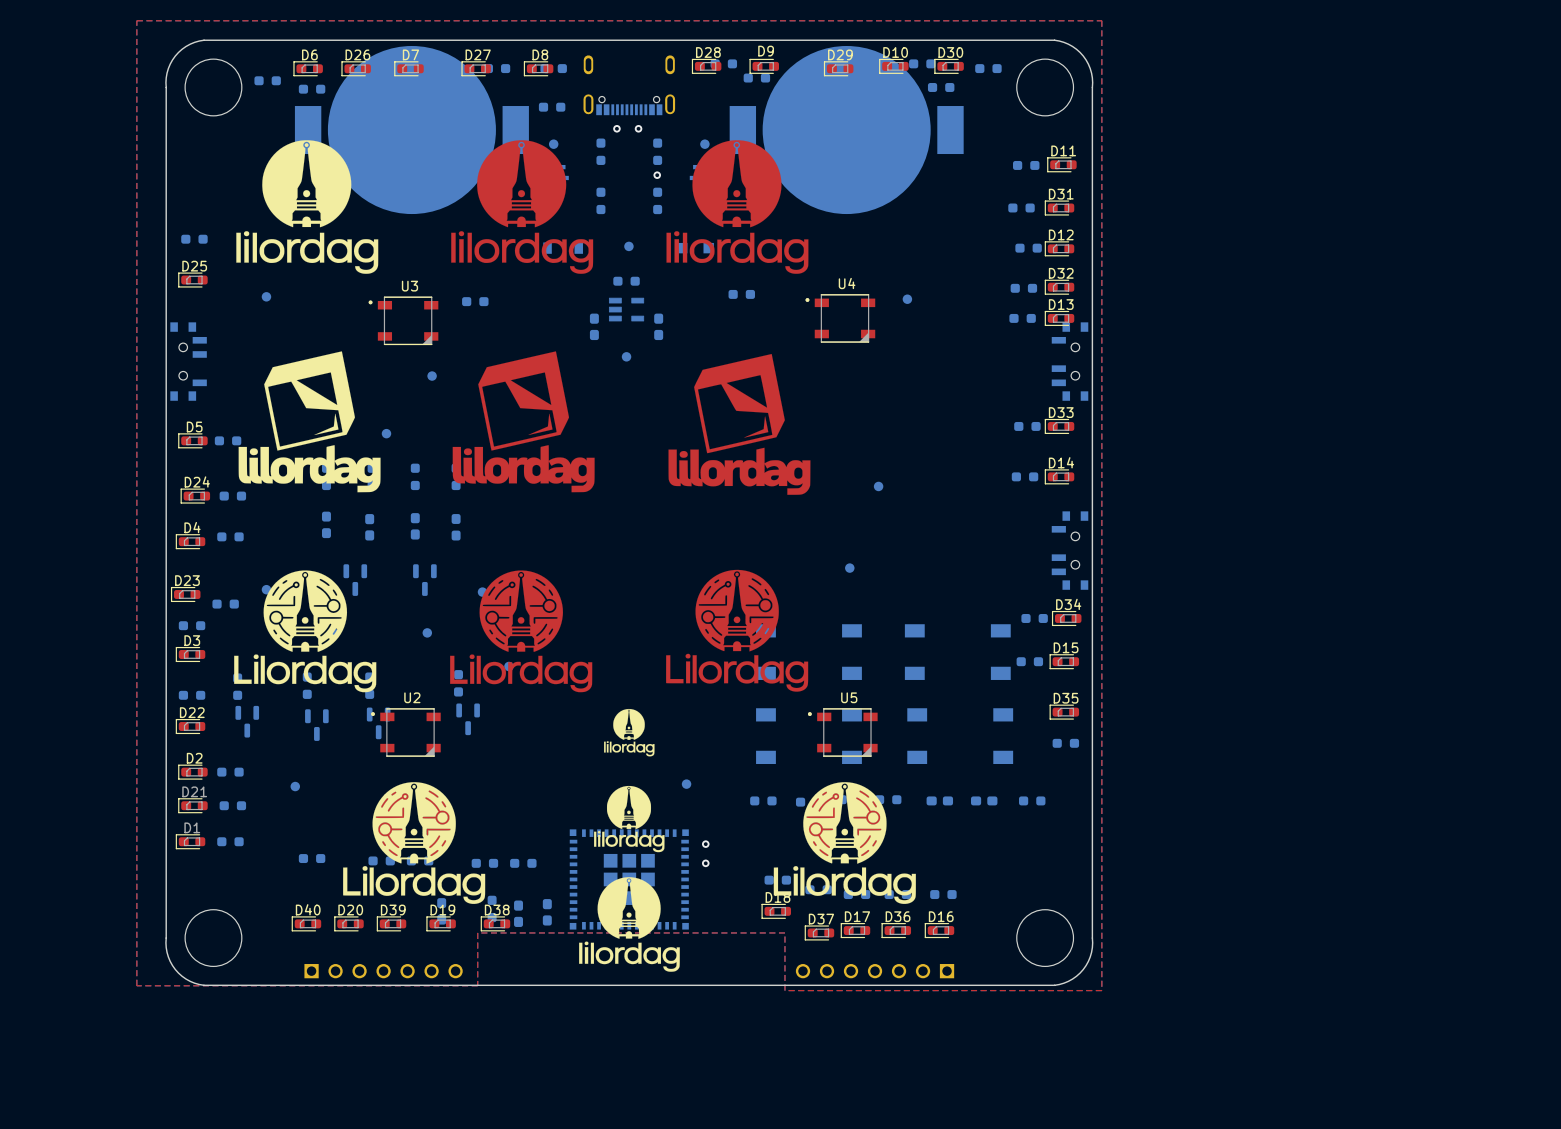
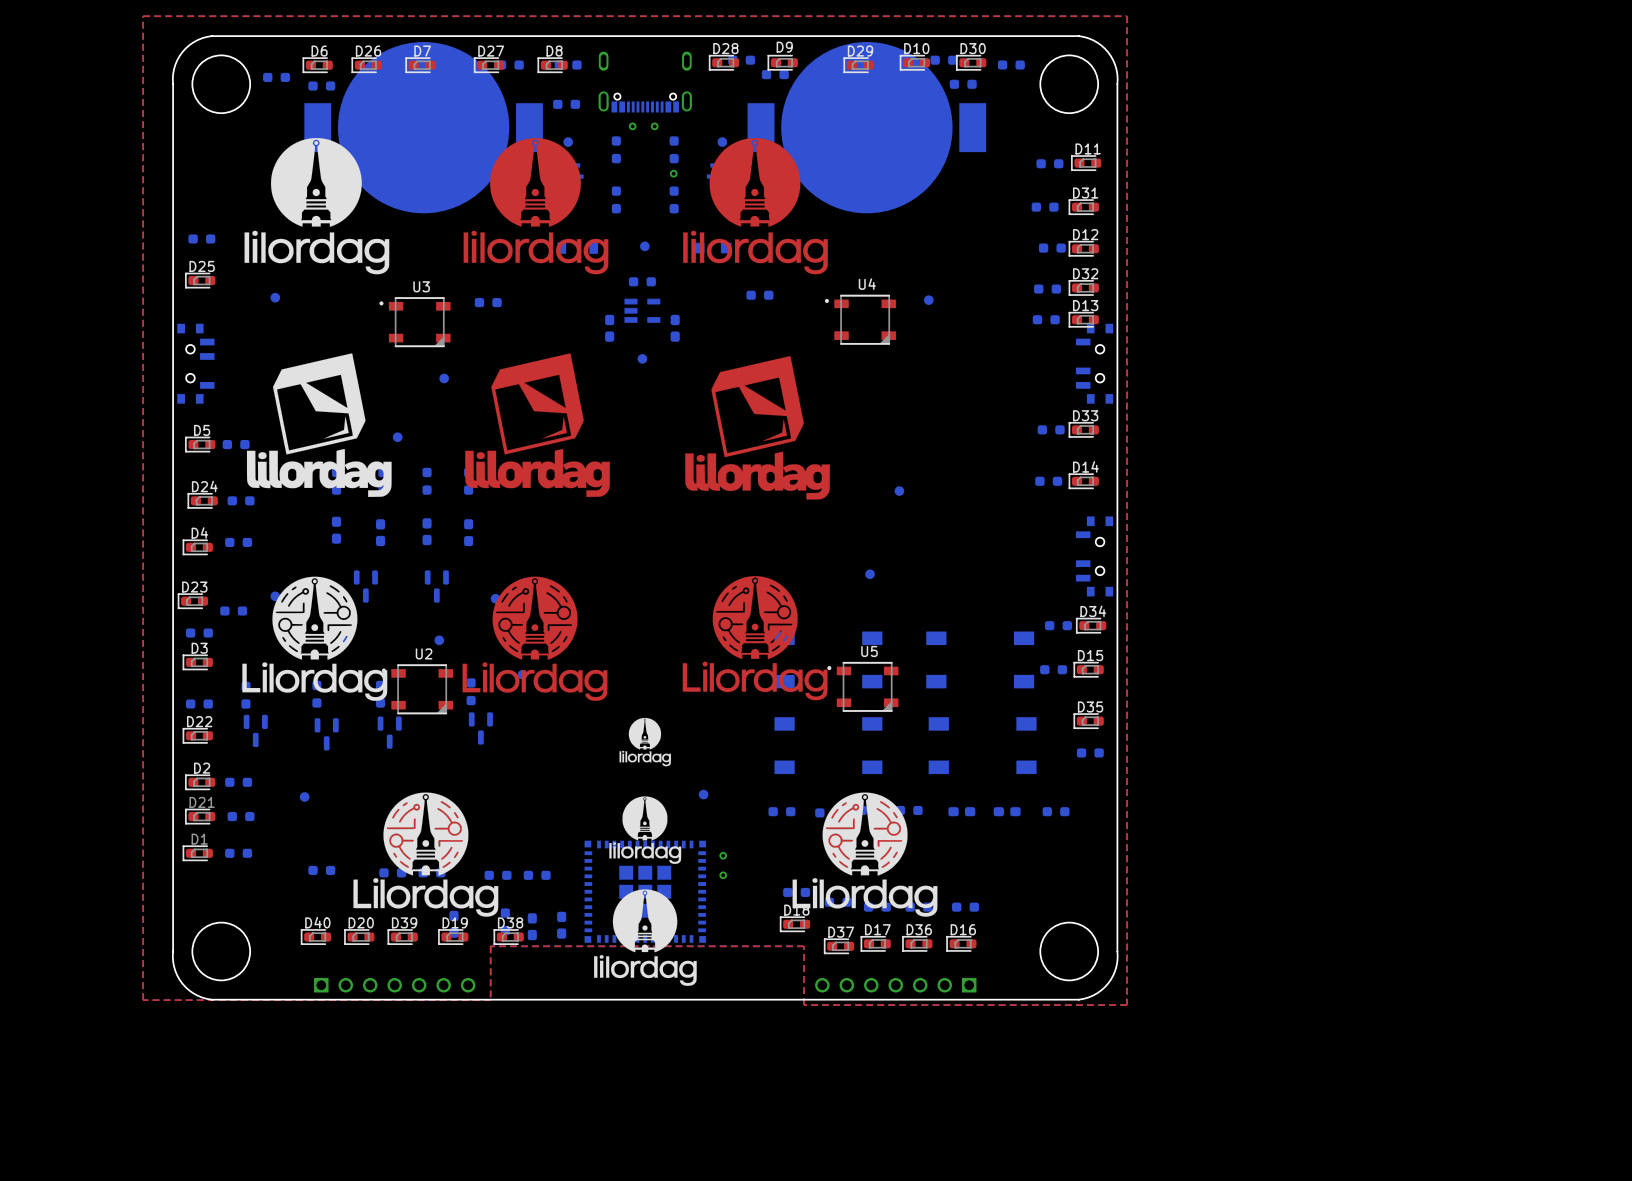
U2 position: (405, 732) -> (417, 689)
U5 position: (842, 732) -> (862, 686)

